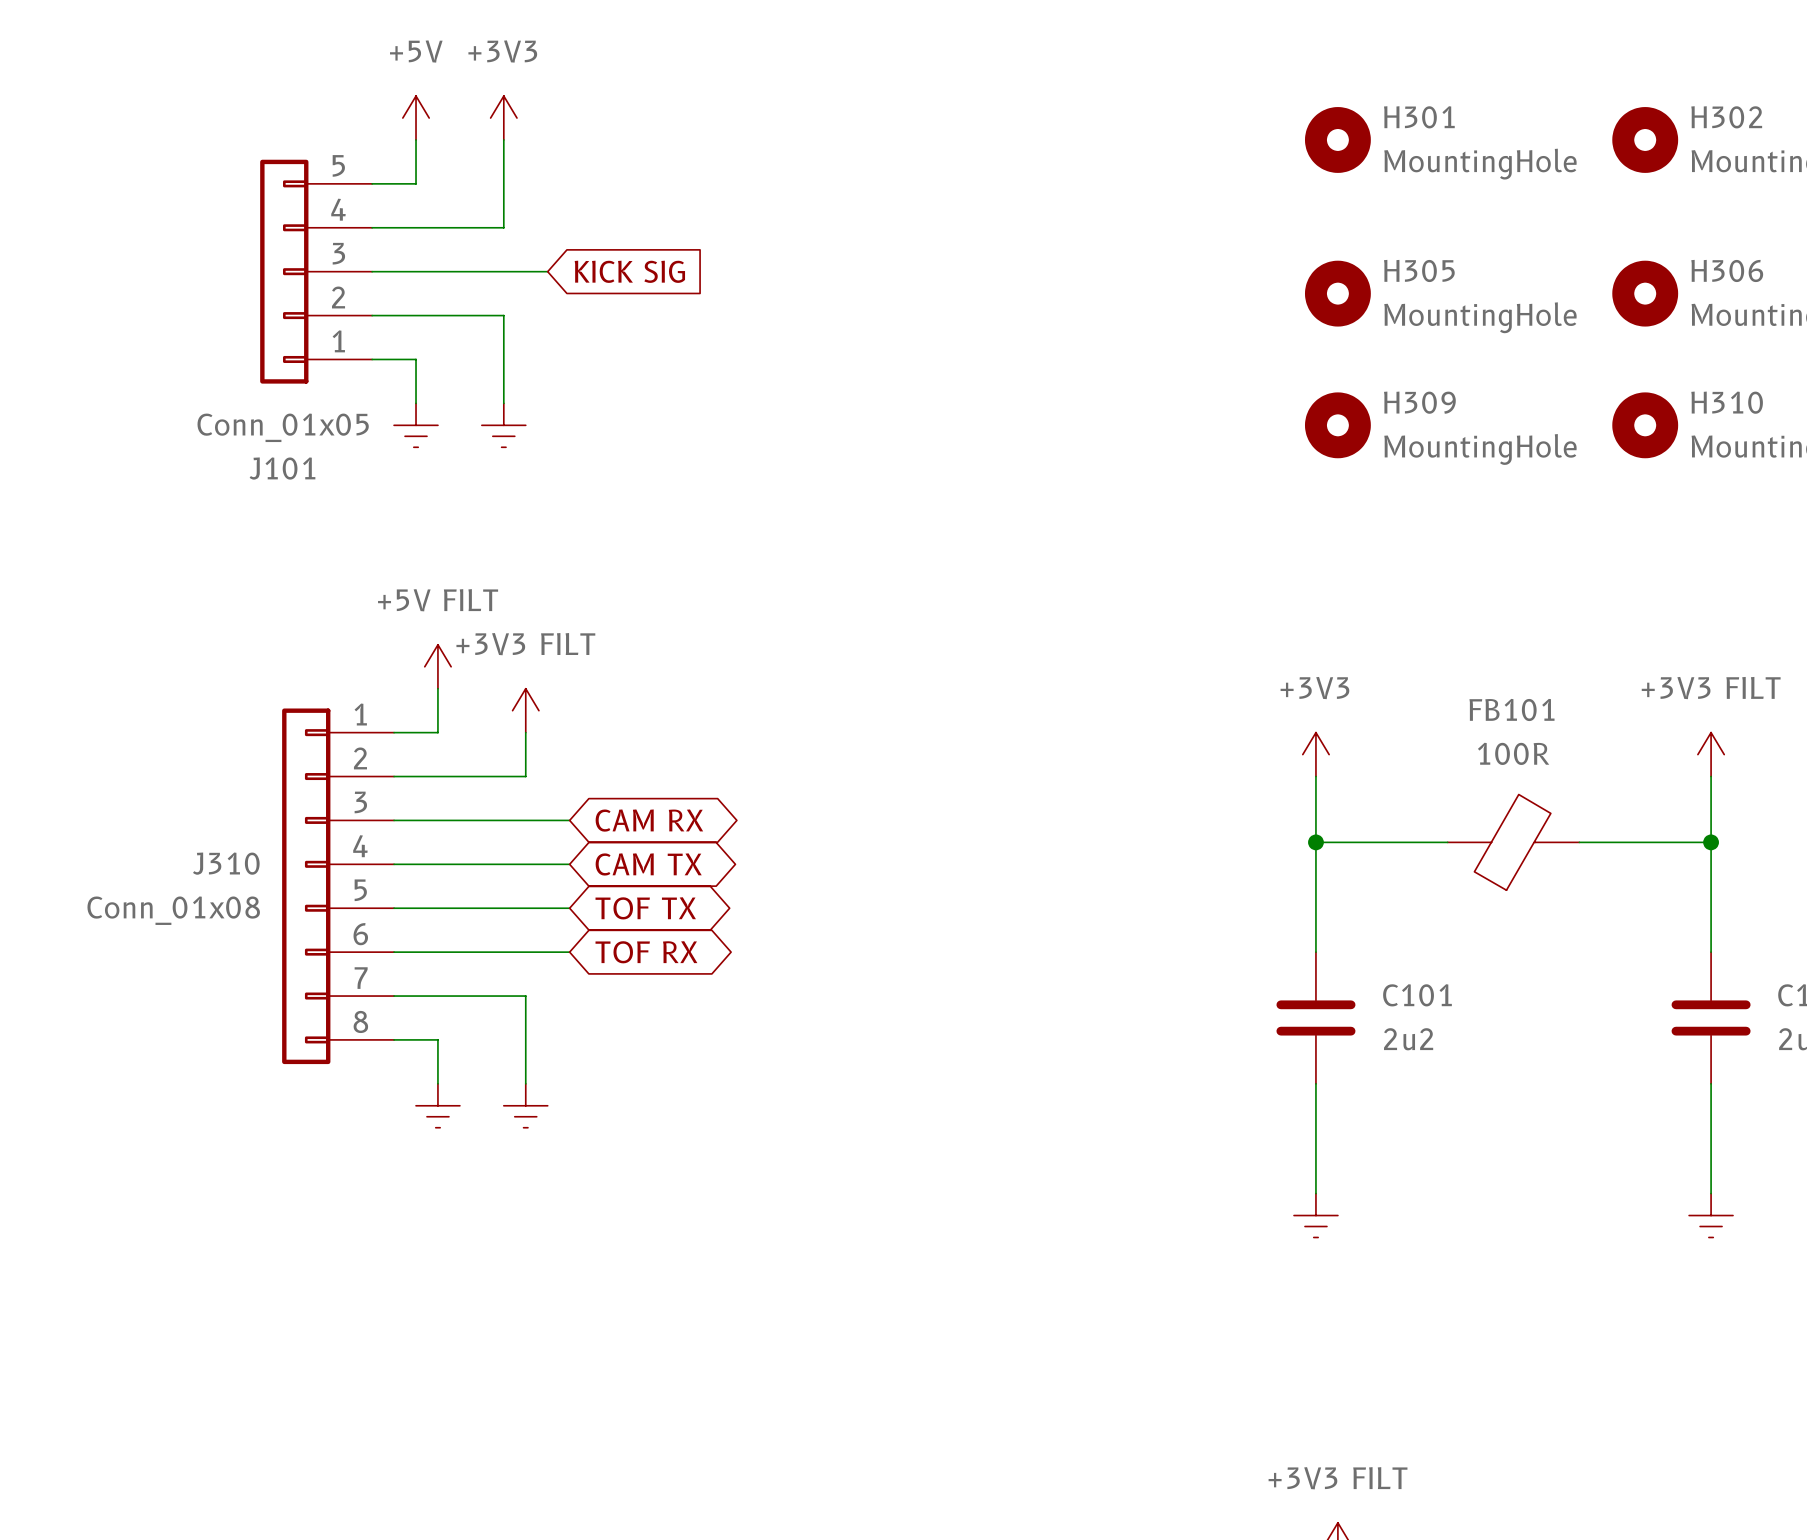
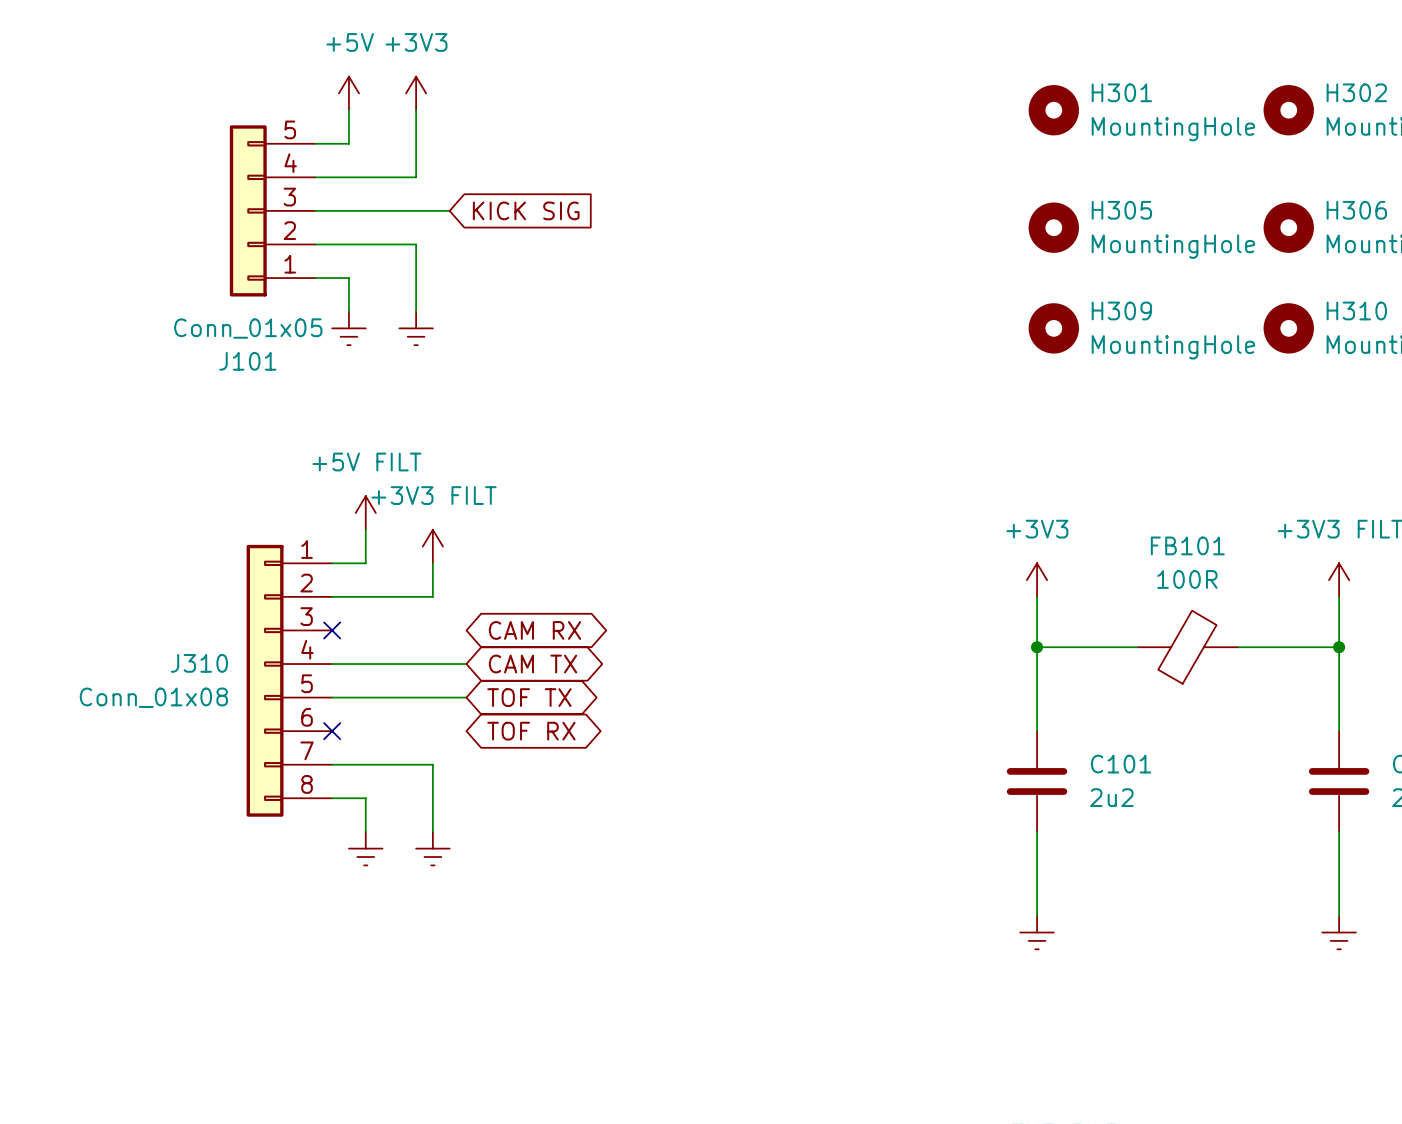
wire: (394, 820) (569, 820) -> none
no-connect mark: none -> (332, 630)
wire: (394, 952) (569, 952) -> none
no-connect mark: none -> (332, 731)

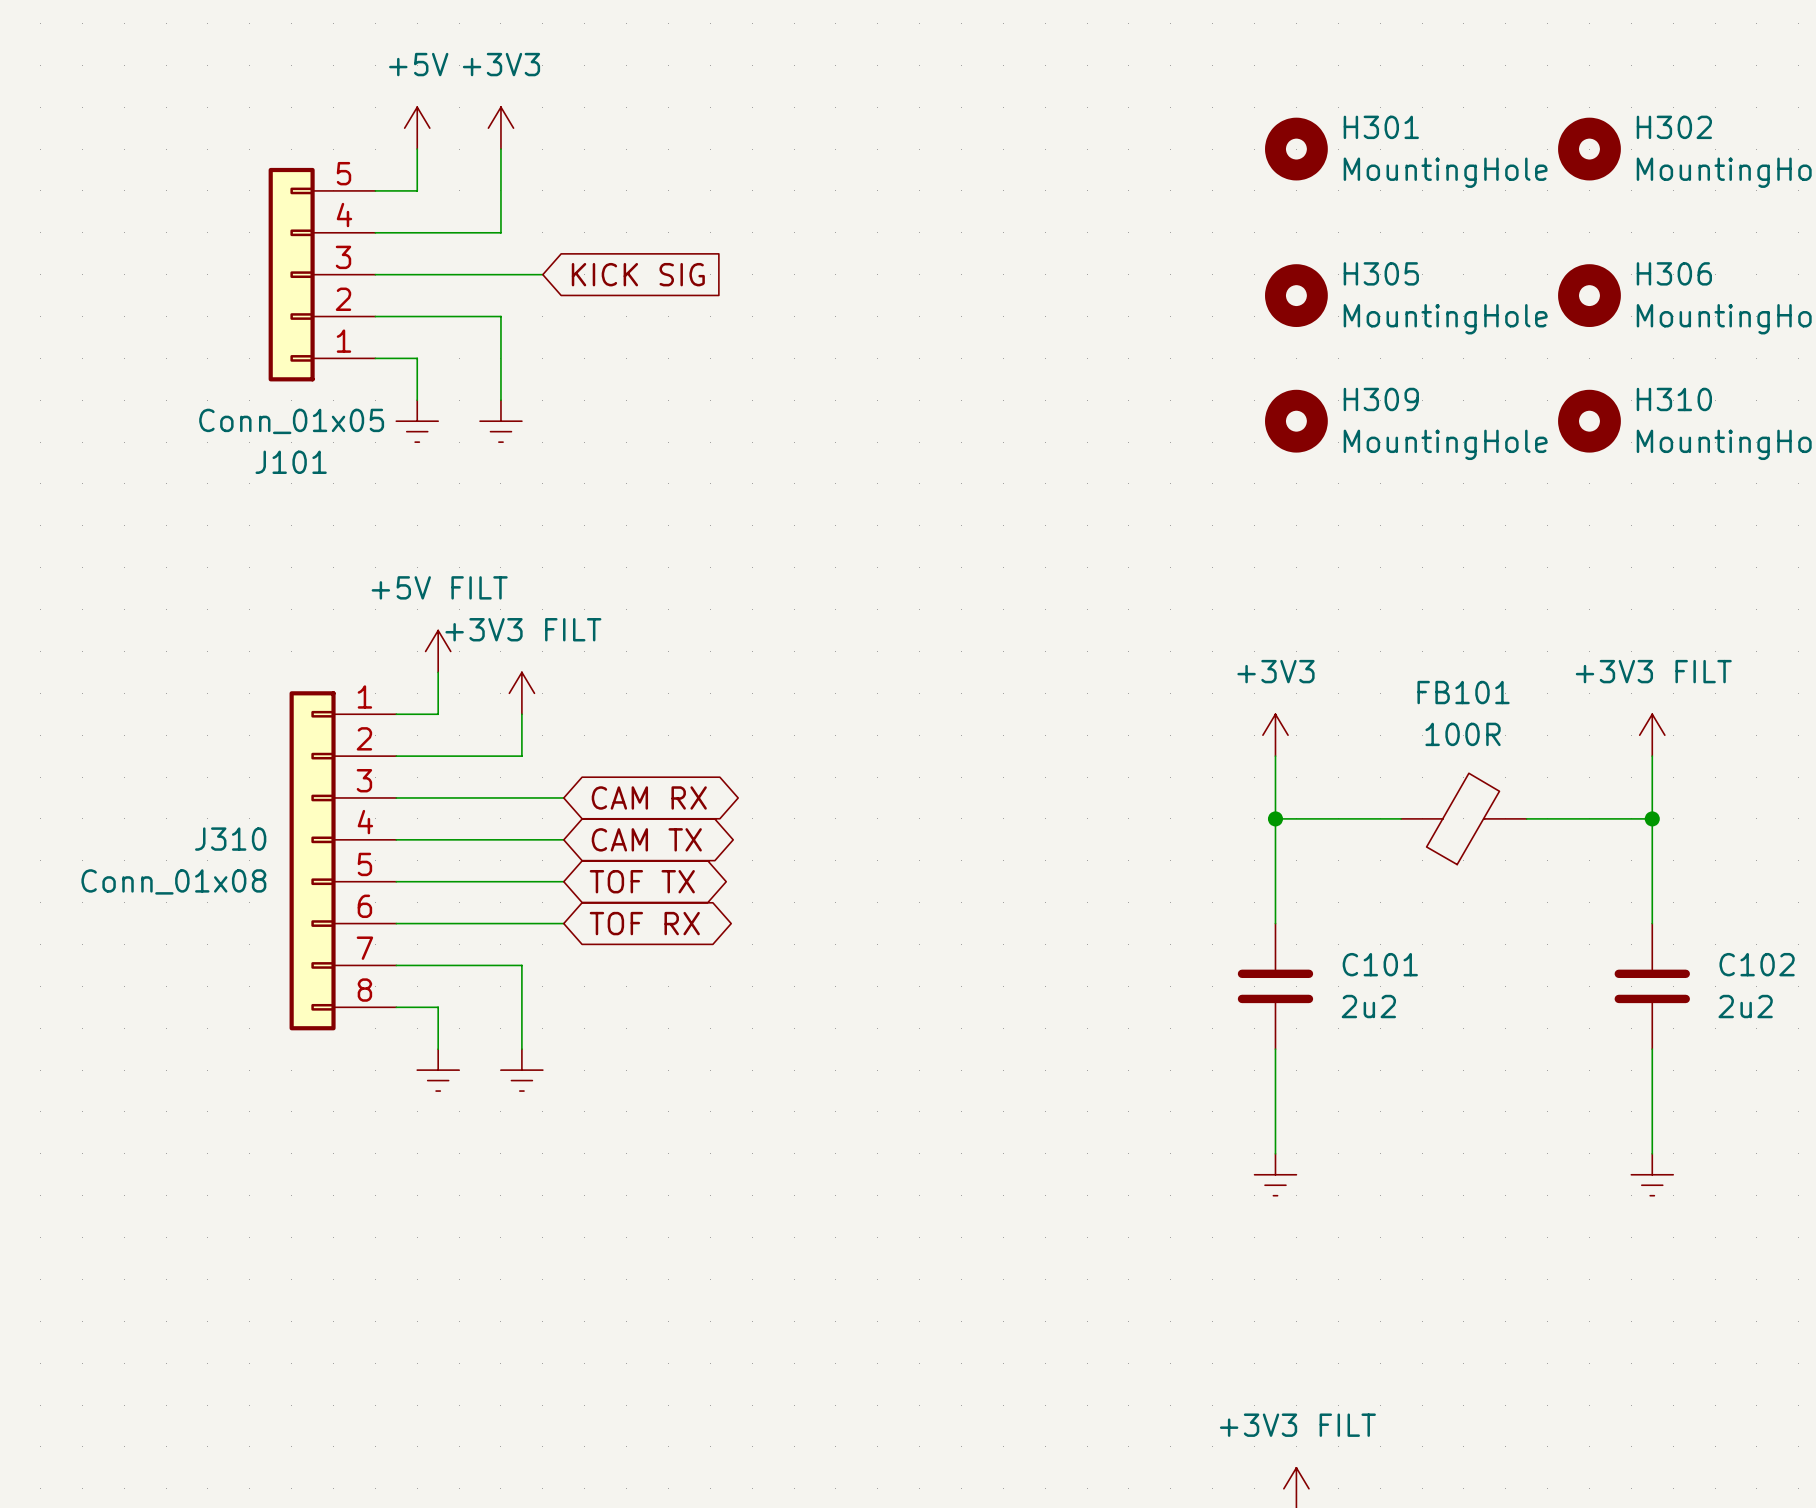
wire: none -> (396, 797) (563, 797)
no-connect mark: (332, 630) -> none
wire: none -> (396, 923) (563, 923)
no-connect mark: (332, 731) -> none

